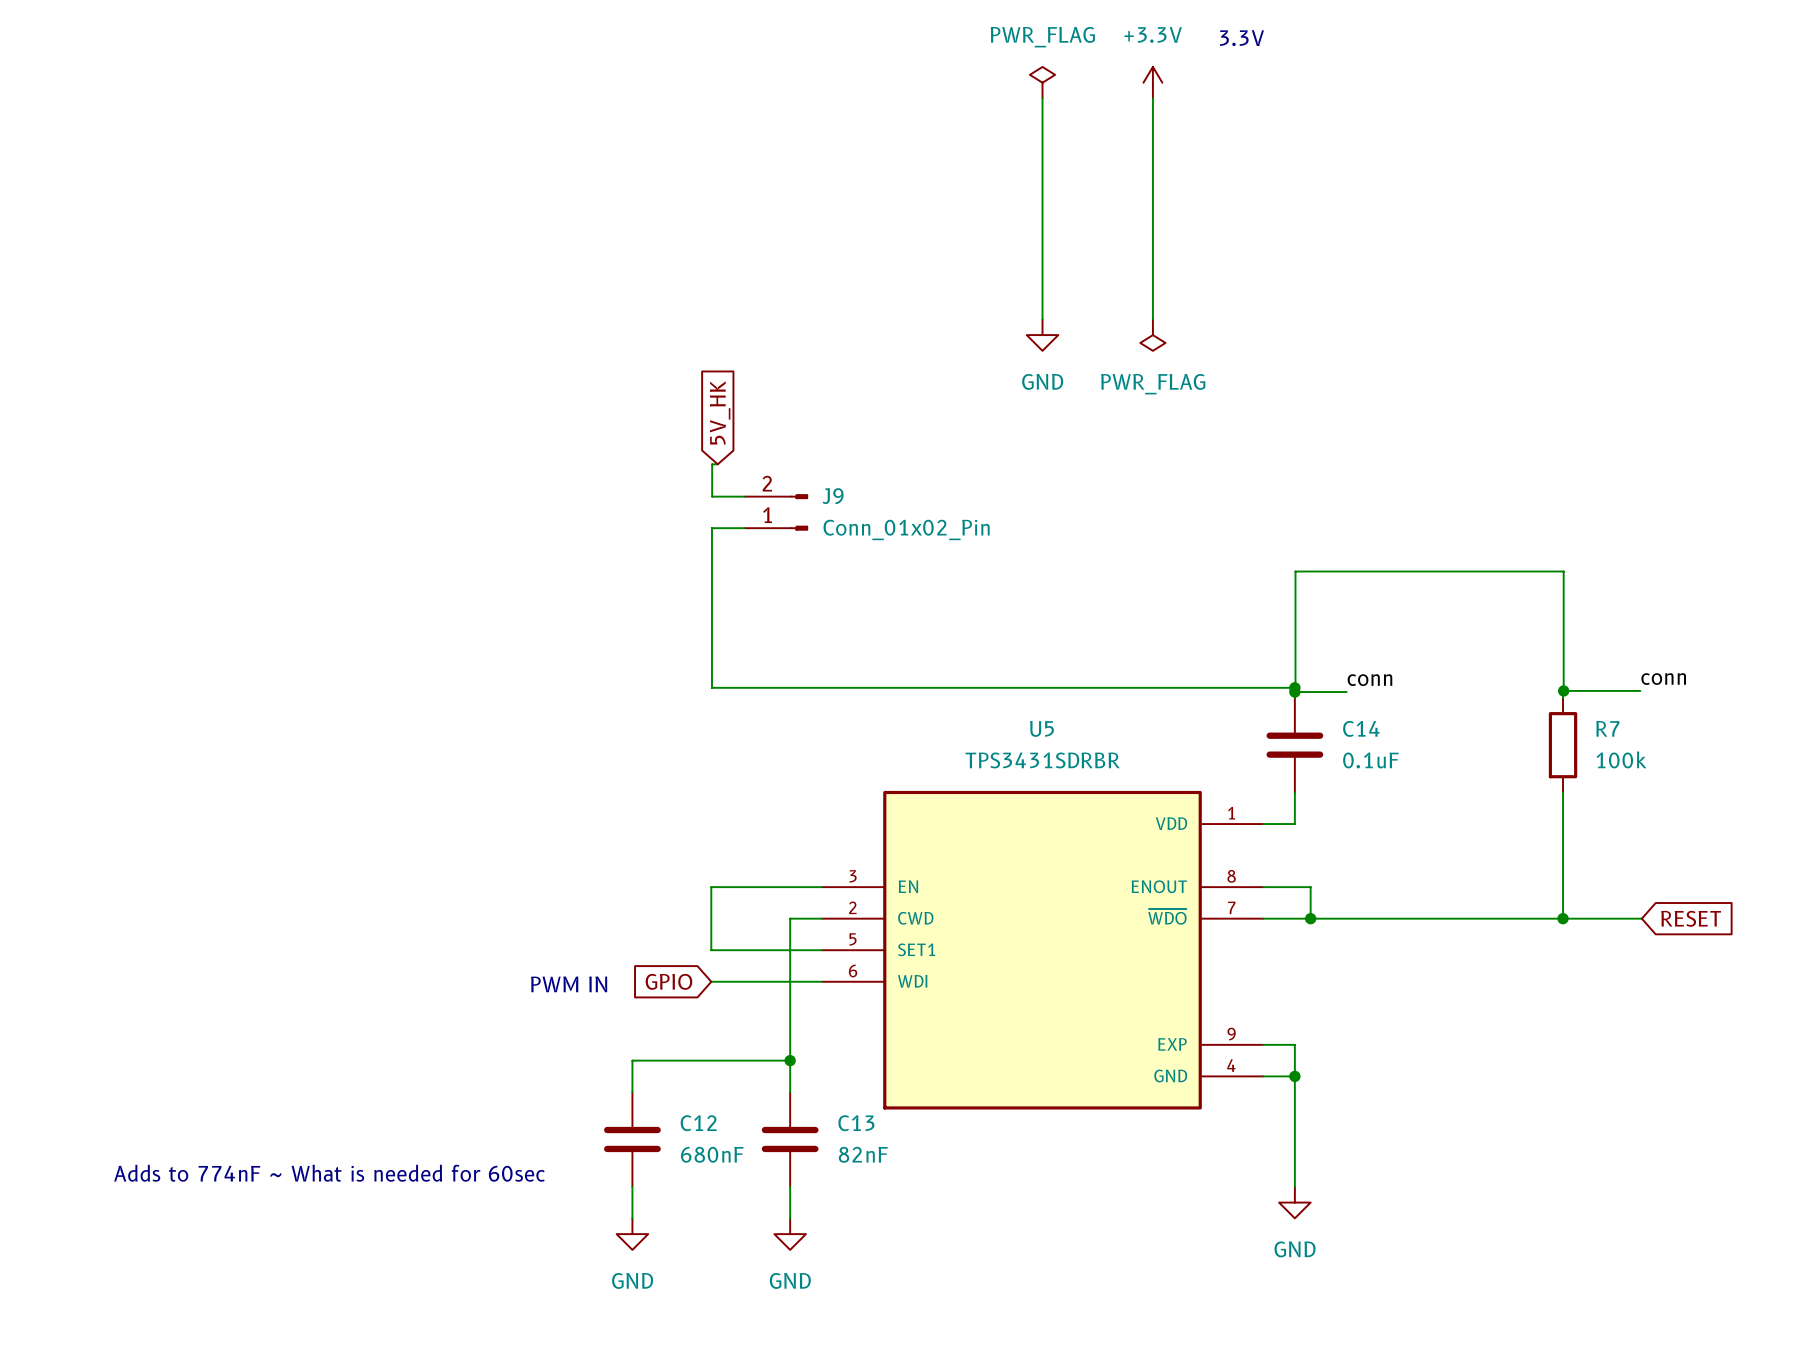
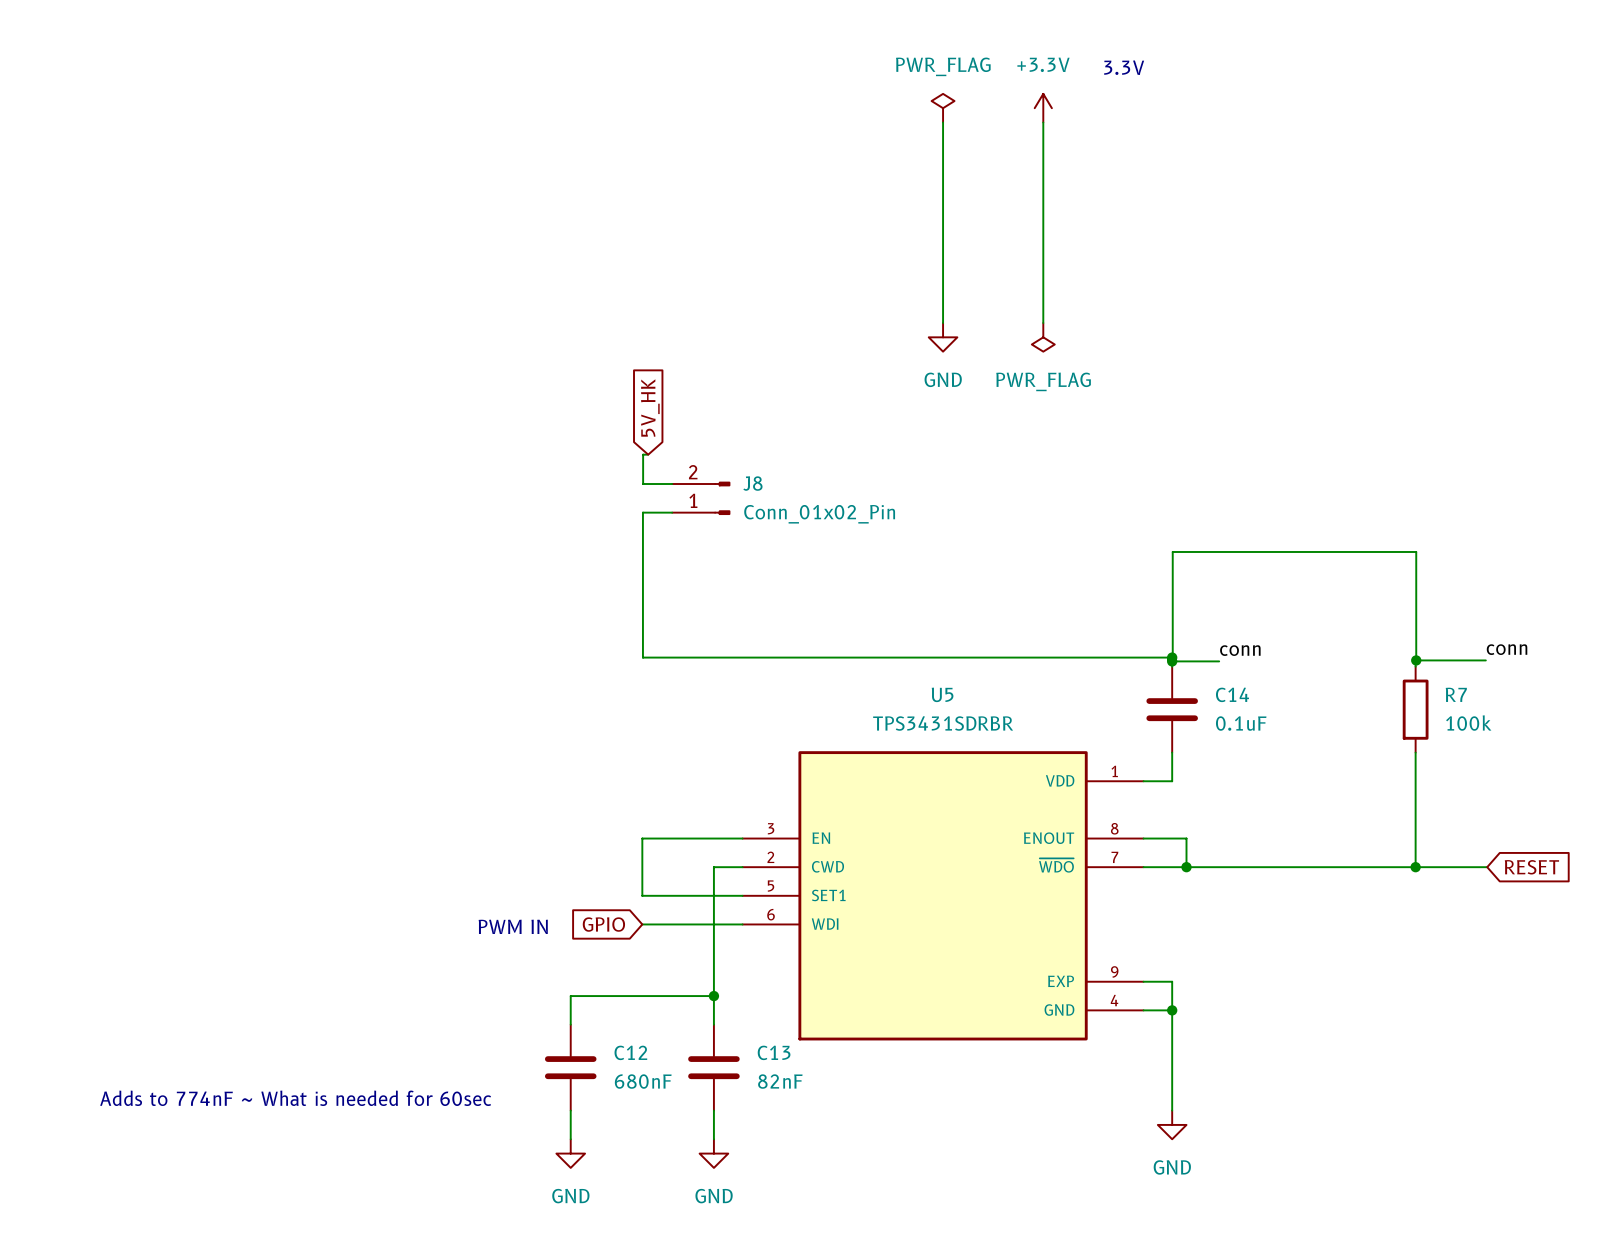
J9 name: J9 (833, 496) -> J8 (752, 483)

